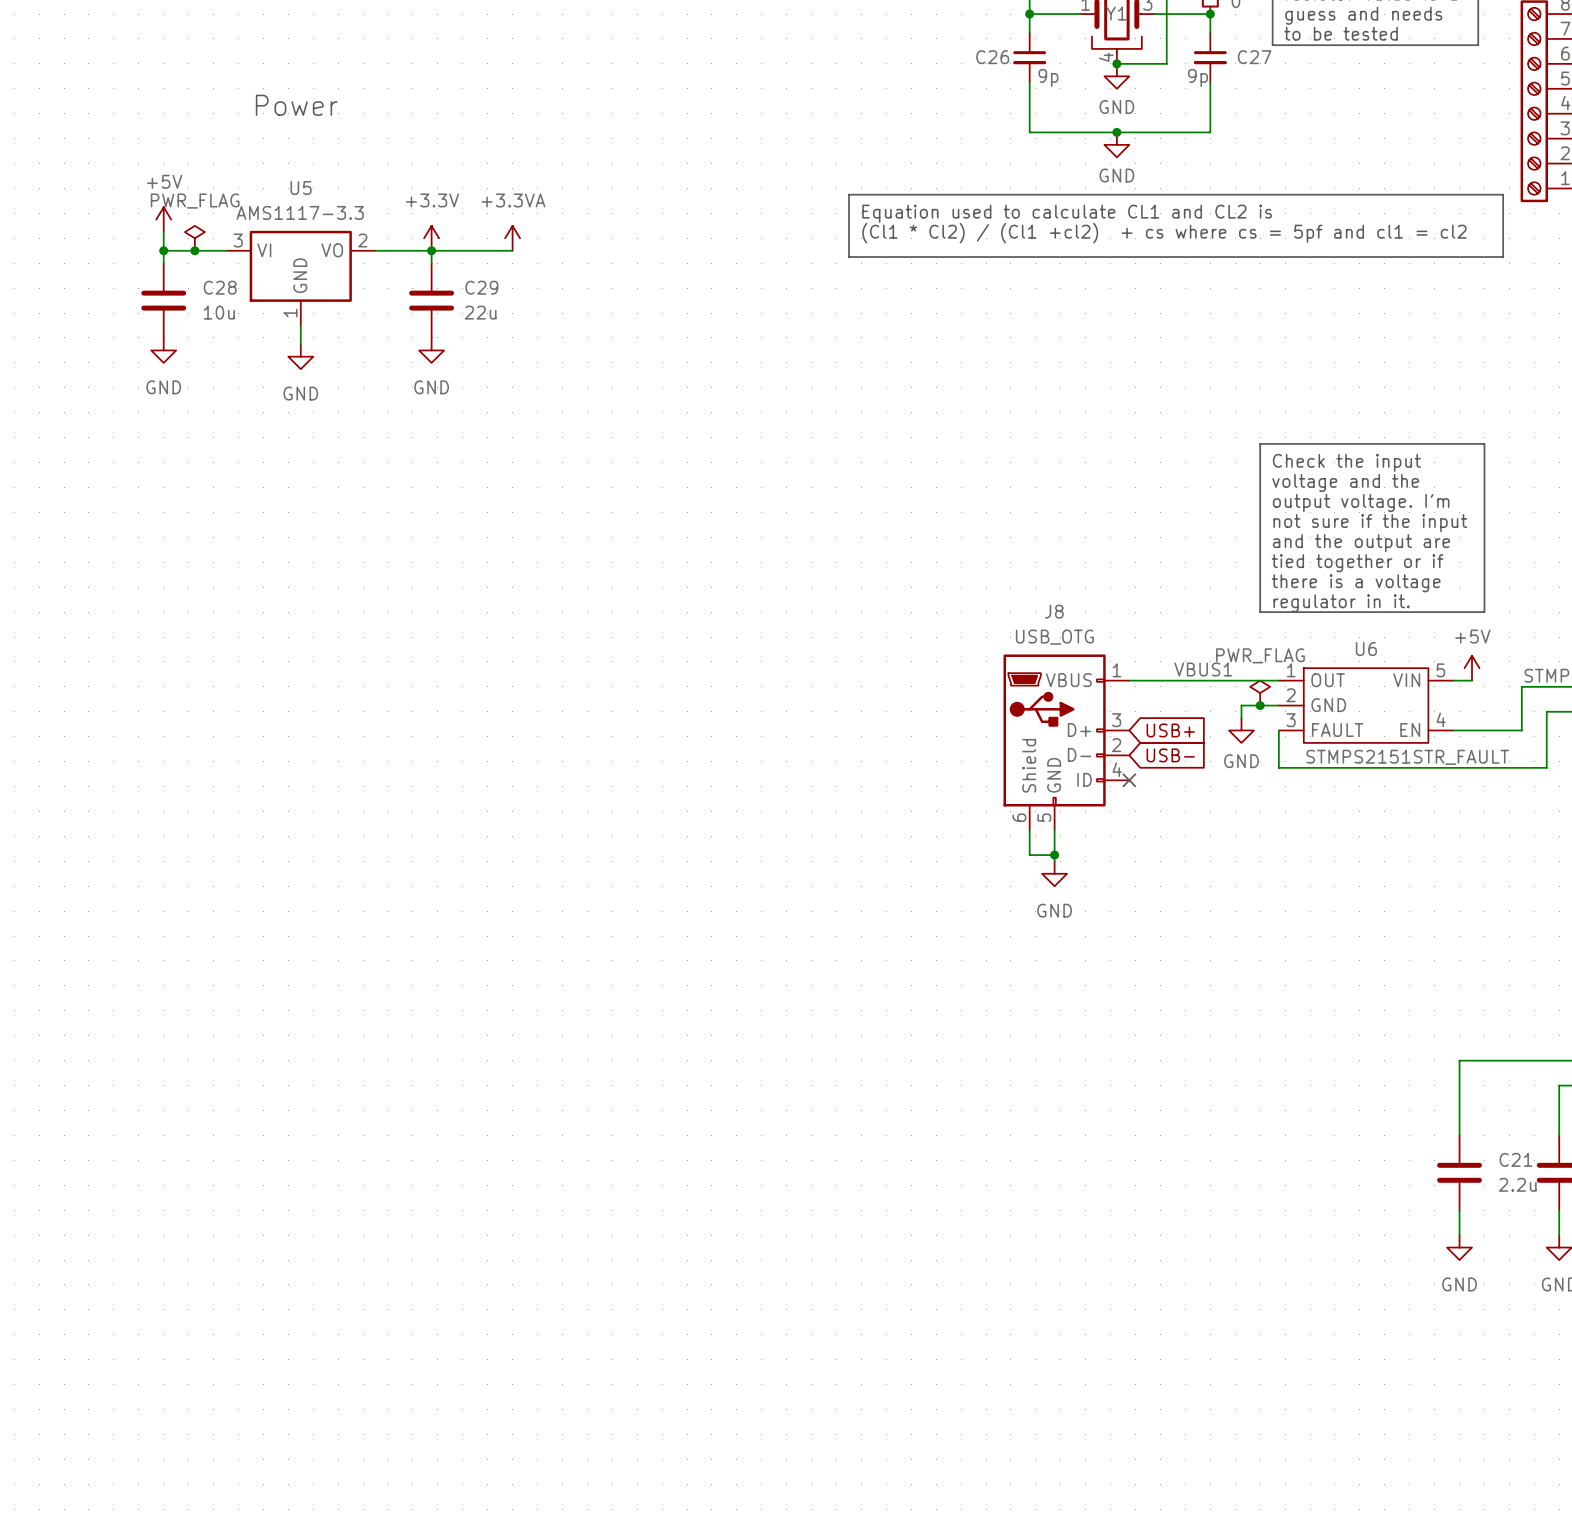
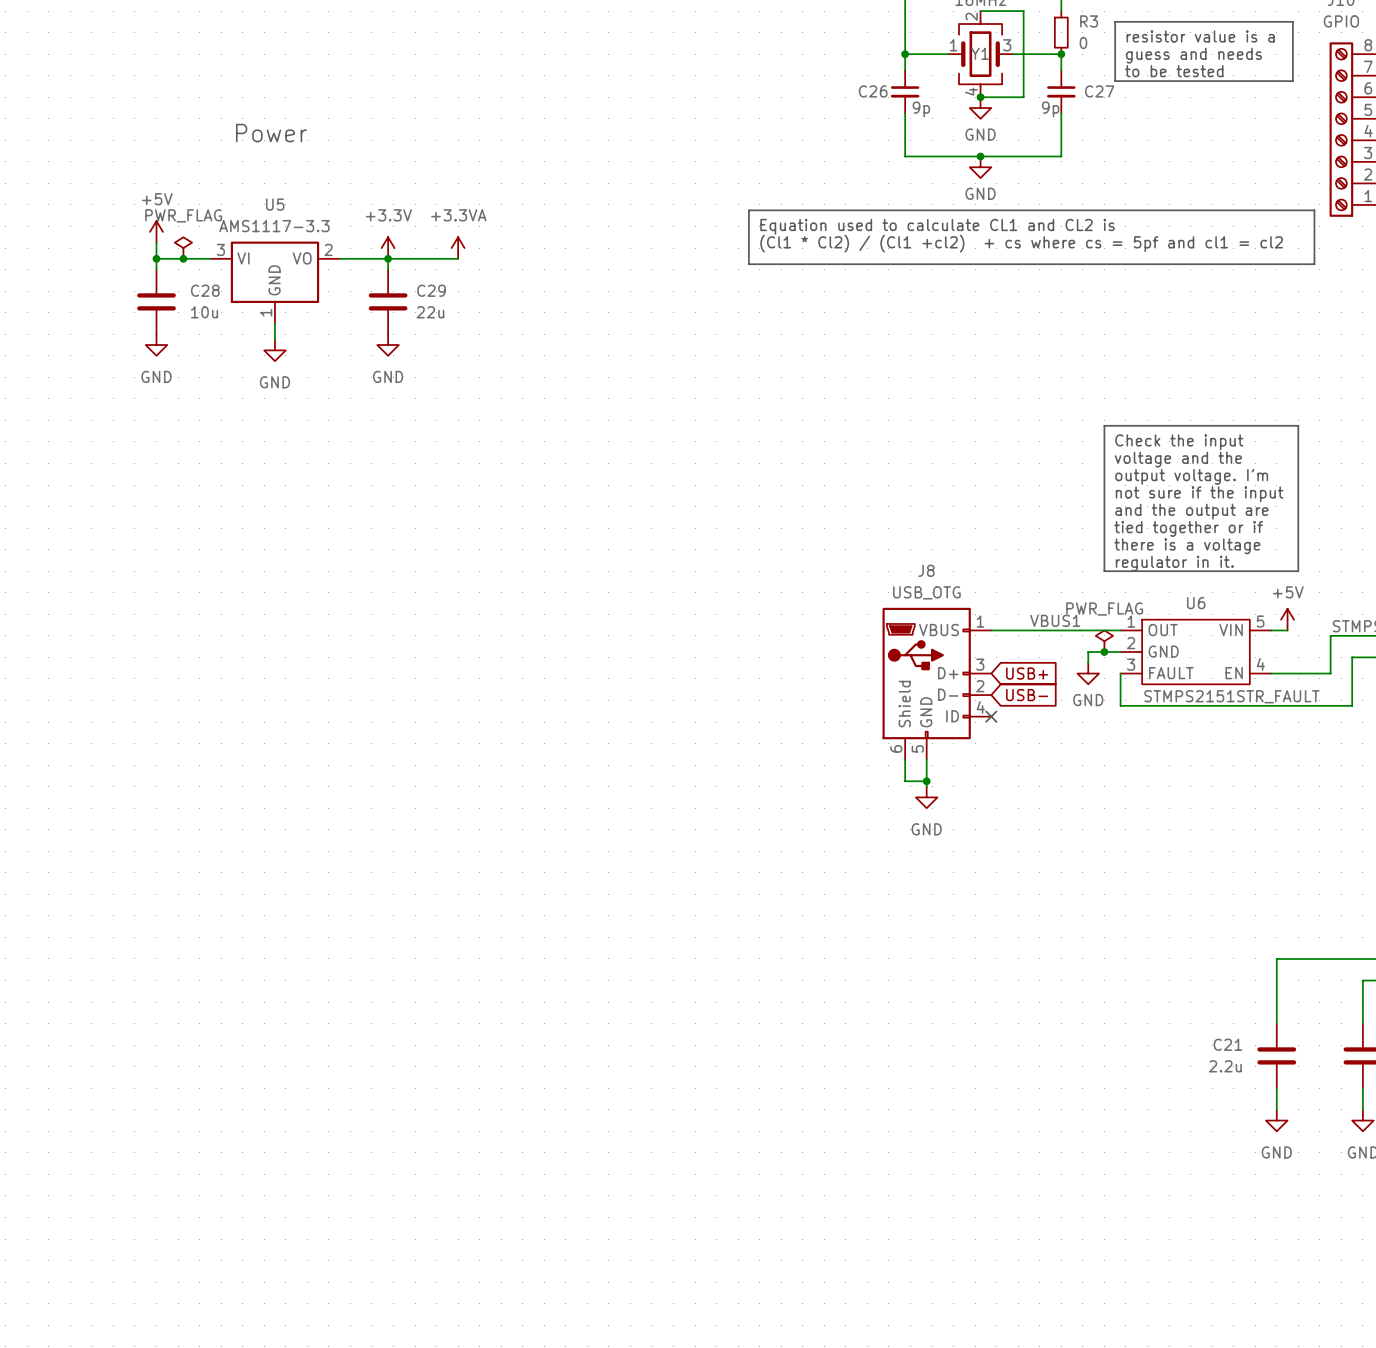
C21 name position: C21 (1516, 1159) -> C21 (1227, 1044)
C21 value position: 2.2u (1517, 1184) -> 2.2u (1225, 1066)

